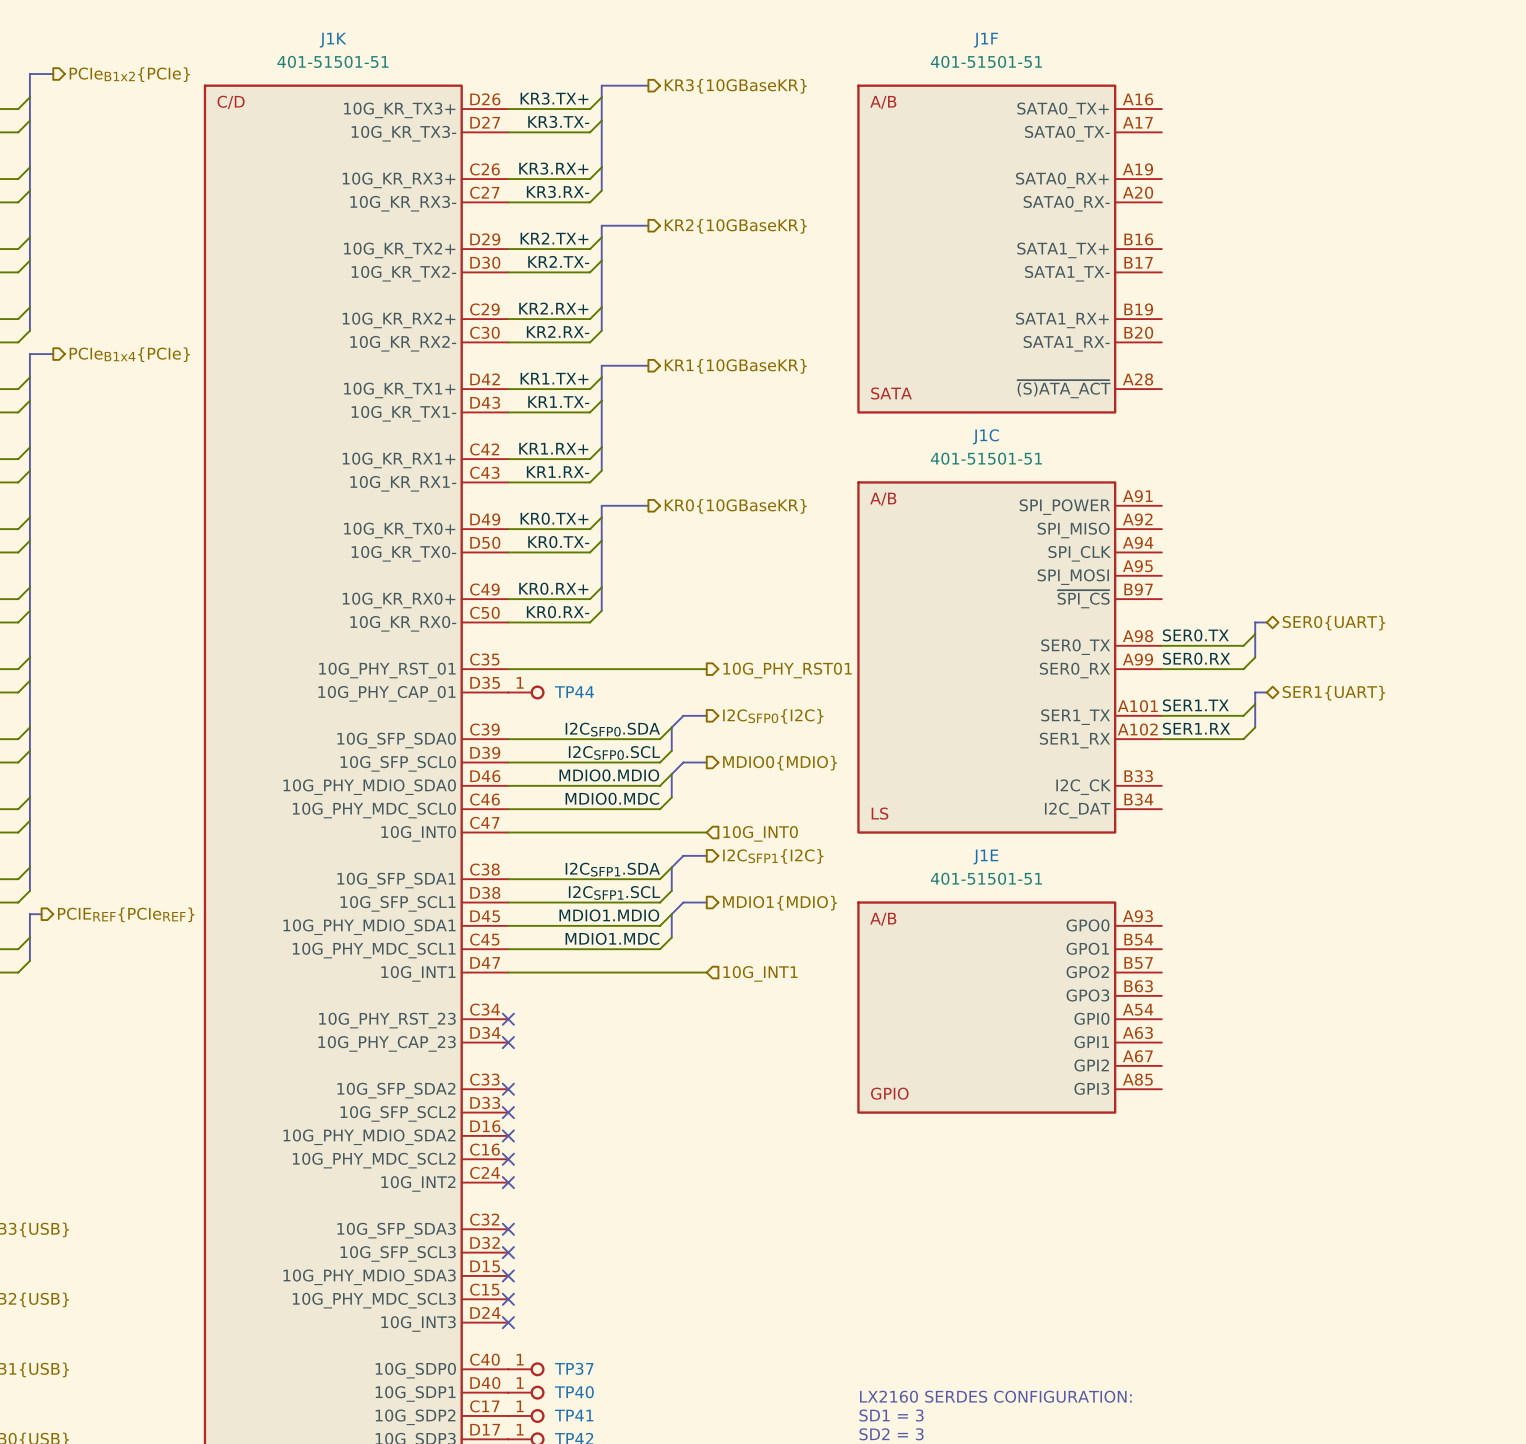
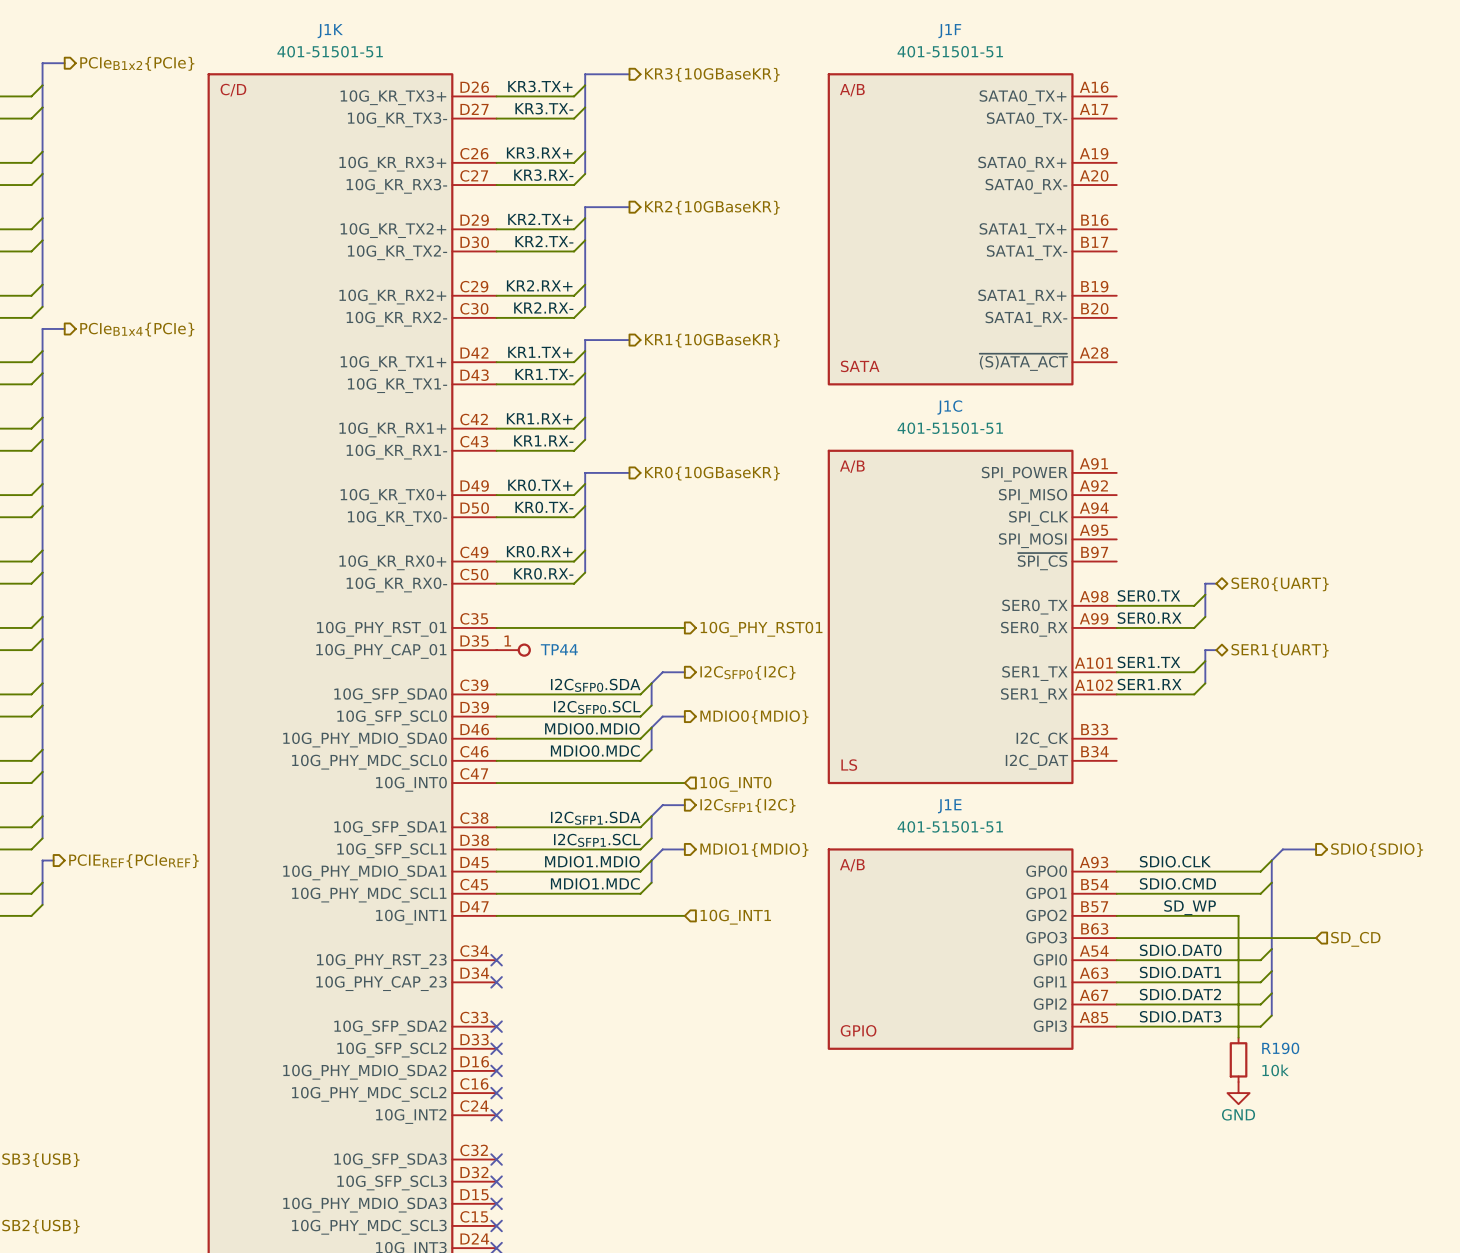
bus: none -> (1316, 849) (1282, 849) (1271, 860) (1271, 1015)
hierarchical label: none -> SDIO{SDIO} (1377, 850)
wire: none -> (1271, 860) (1260, 871) (1116, 871)
label: none -> SDIO.CLK (1175, 861)
wire: none -> (1271, 882) (1260, 893) (1116, 893)
label: none -> SDIO.CMD (1177, 883)
label: none -> SD_WP (1190, 907)
wire: none -> (1116, 915) (1238, 915) (1238, 1037)
wire: none -> (1116, 938) (1316, 938)
hierarchical label: none -> SD_CD (1355, 939)
wire: none -> (1271, 949) (1260, 960) (1116, 960)
label: none -> SDIO.DAT0 (1180, 950)
wire: none -> (1271, 971) (1260, 982) (1116, 982)
label: none -> SDIO.DAT1 (1180, 972)
wire: none -> (1271, 993) (1260, 1004) (1116, 1004)
label: none -> SDIO.DAT2 (1180, 994)
wire: none -> (1271, 1015) (1260, 1026) (1116, 1026)
label: none -> SDIO.DAT3 (1180, 1016)
R190: none -> (1238, 1059)
power symbol: none -> GND (1238, 1093)

